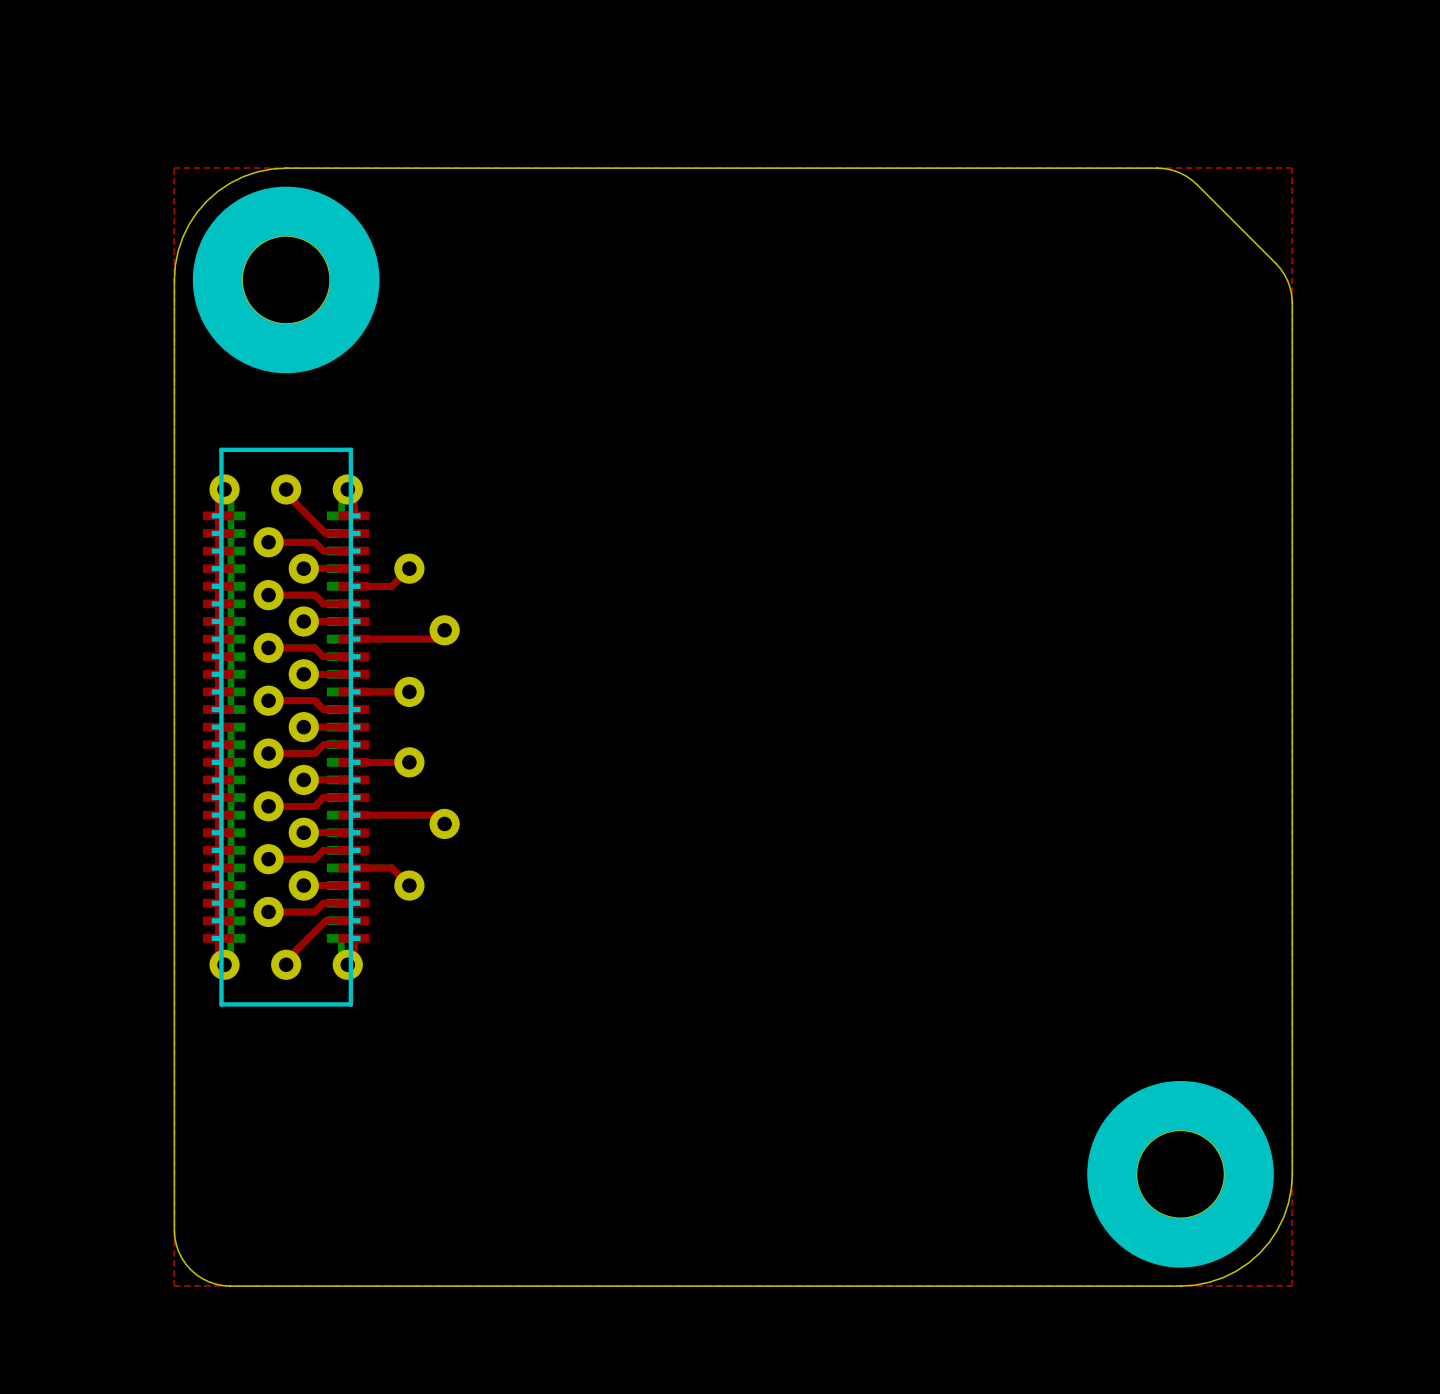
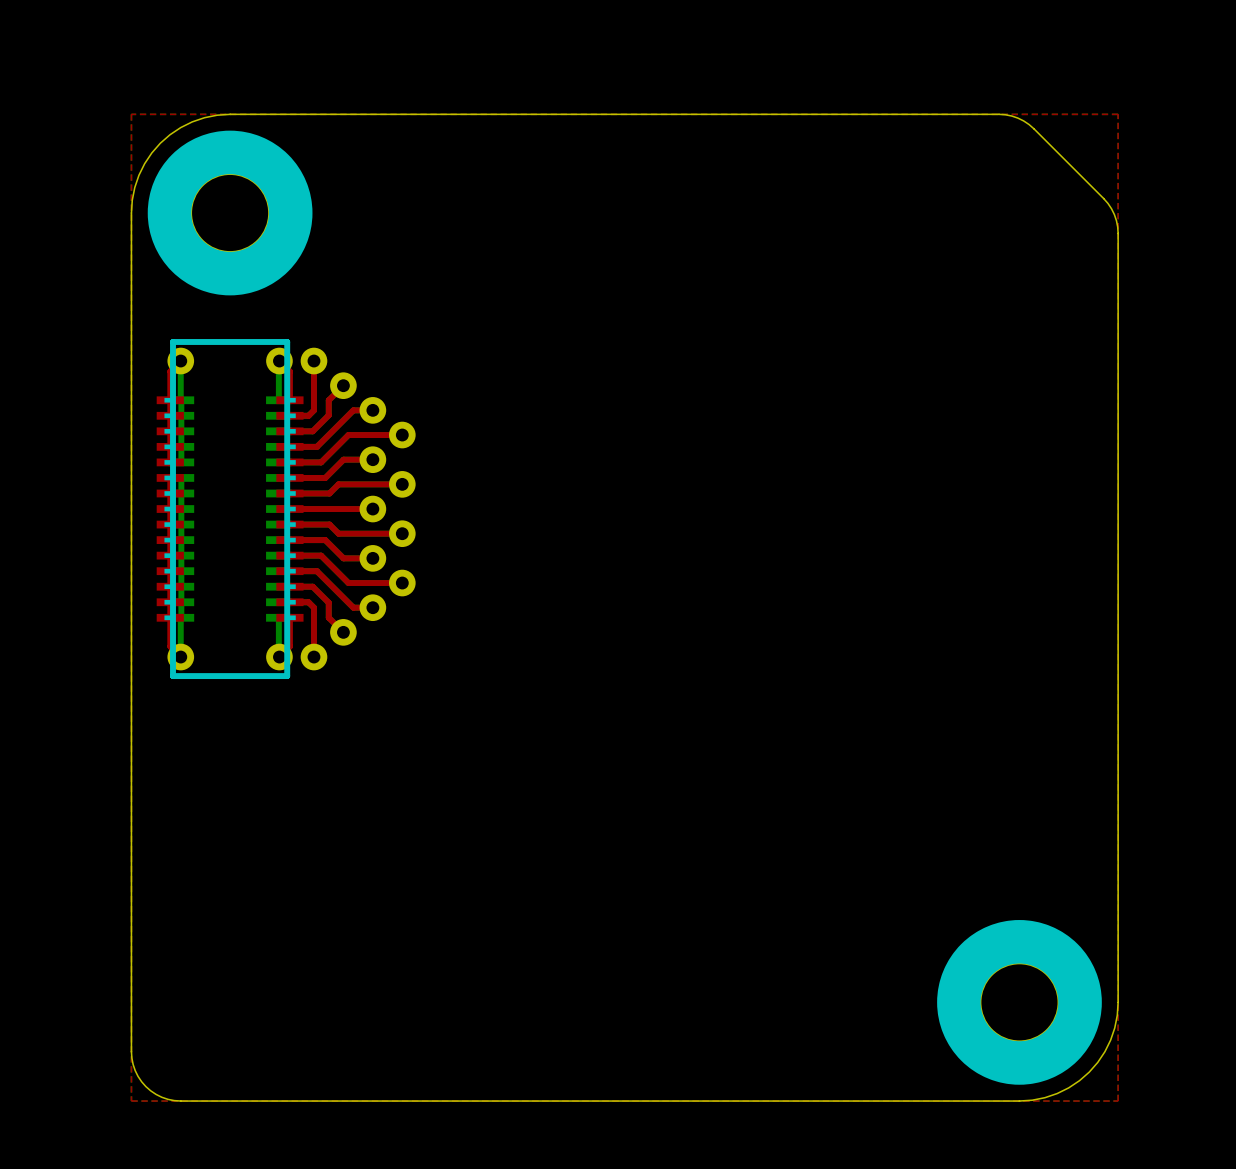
part: none -> (286, 509)
part: (331, 727) -> none

